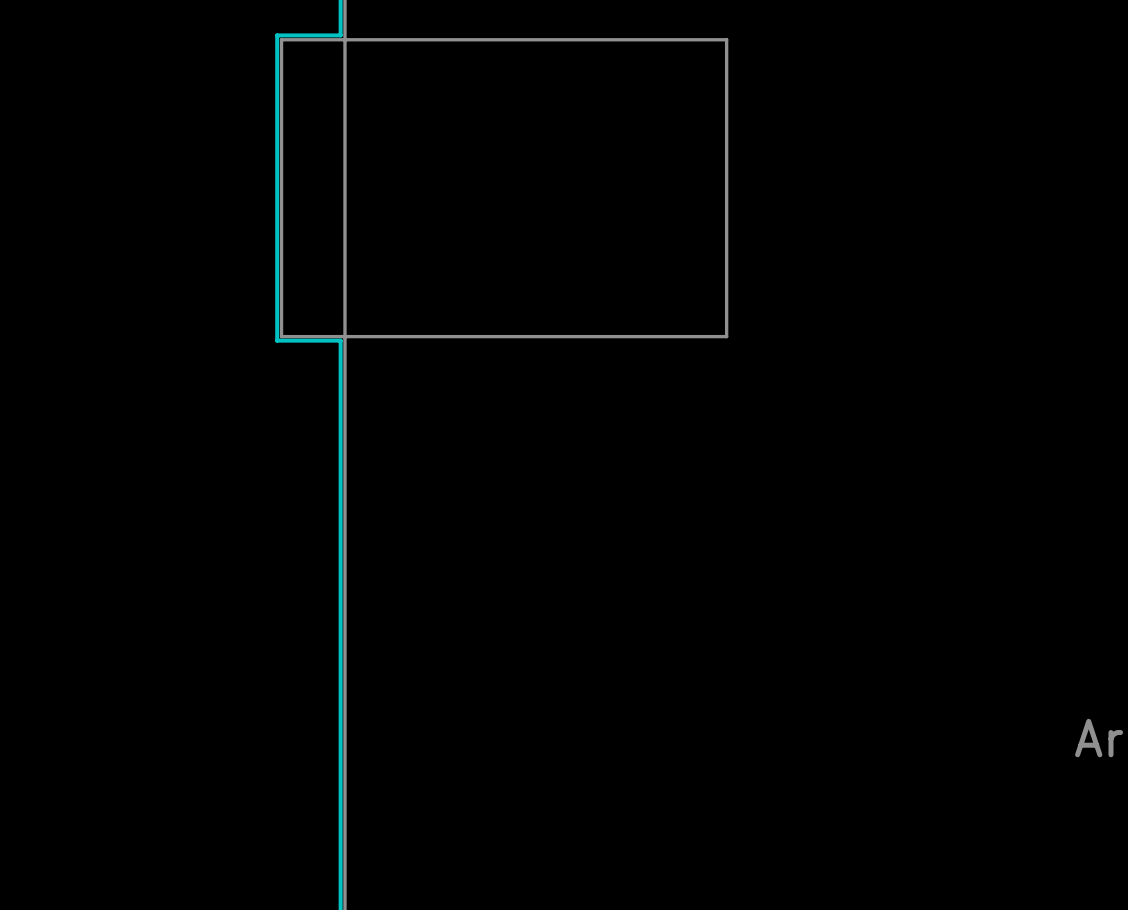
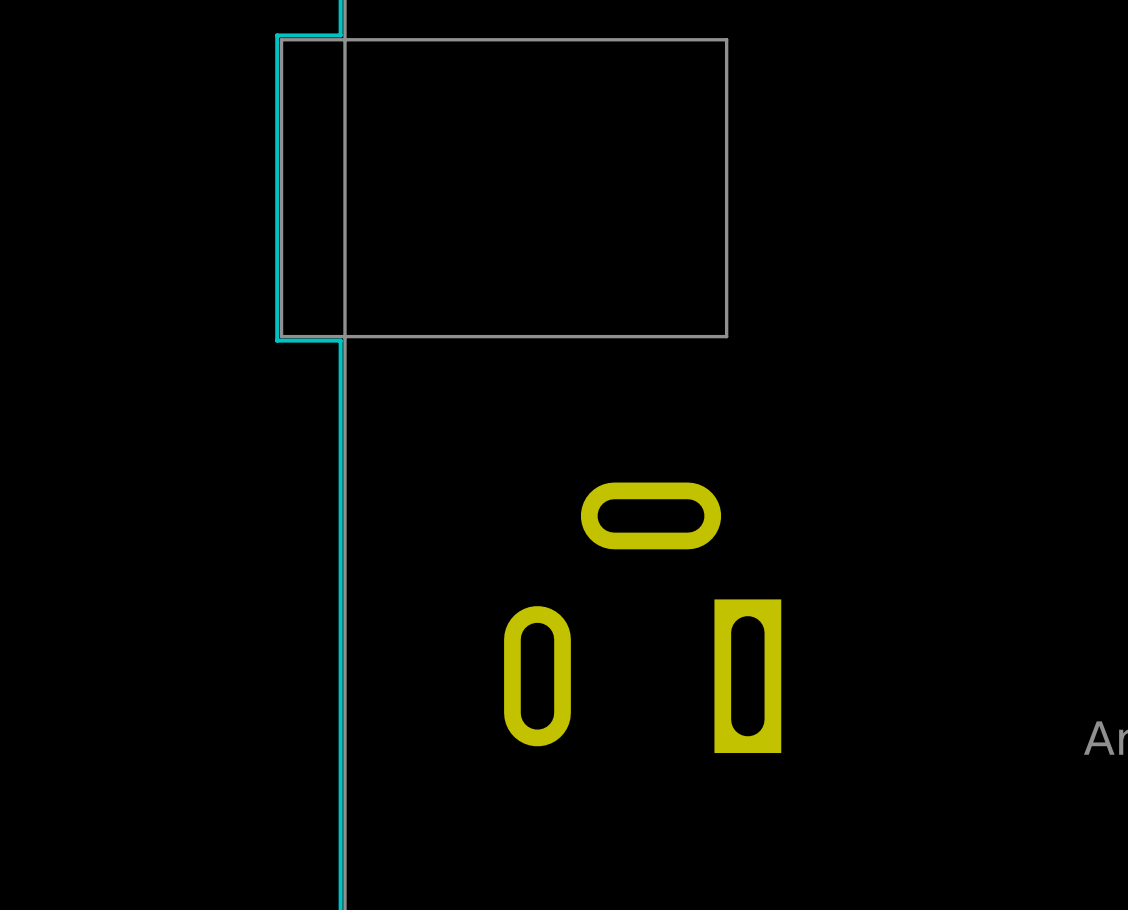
part: none -> (642, 617)

